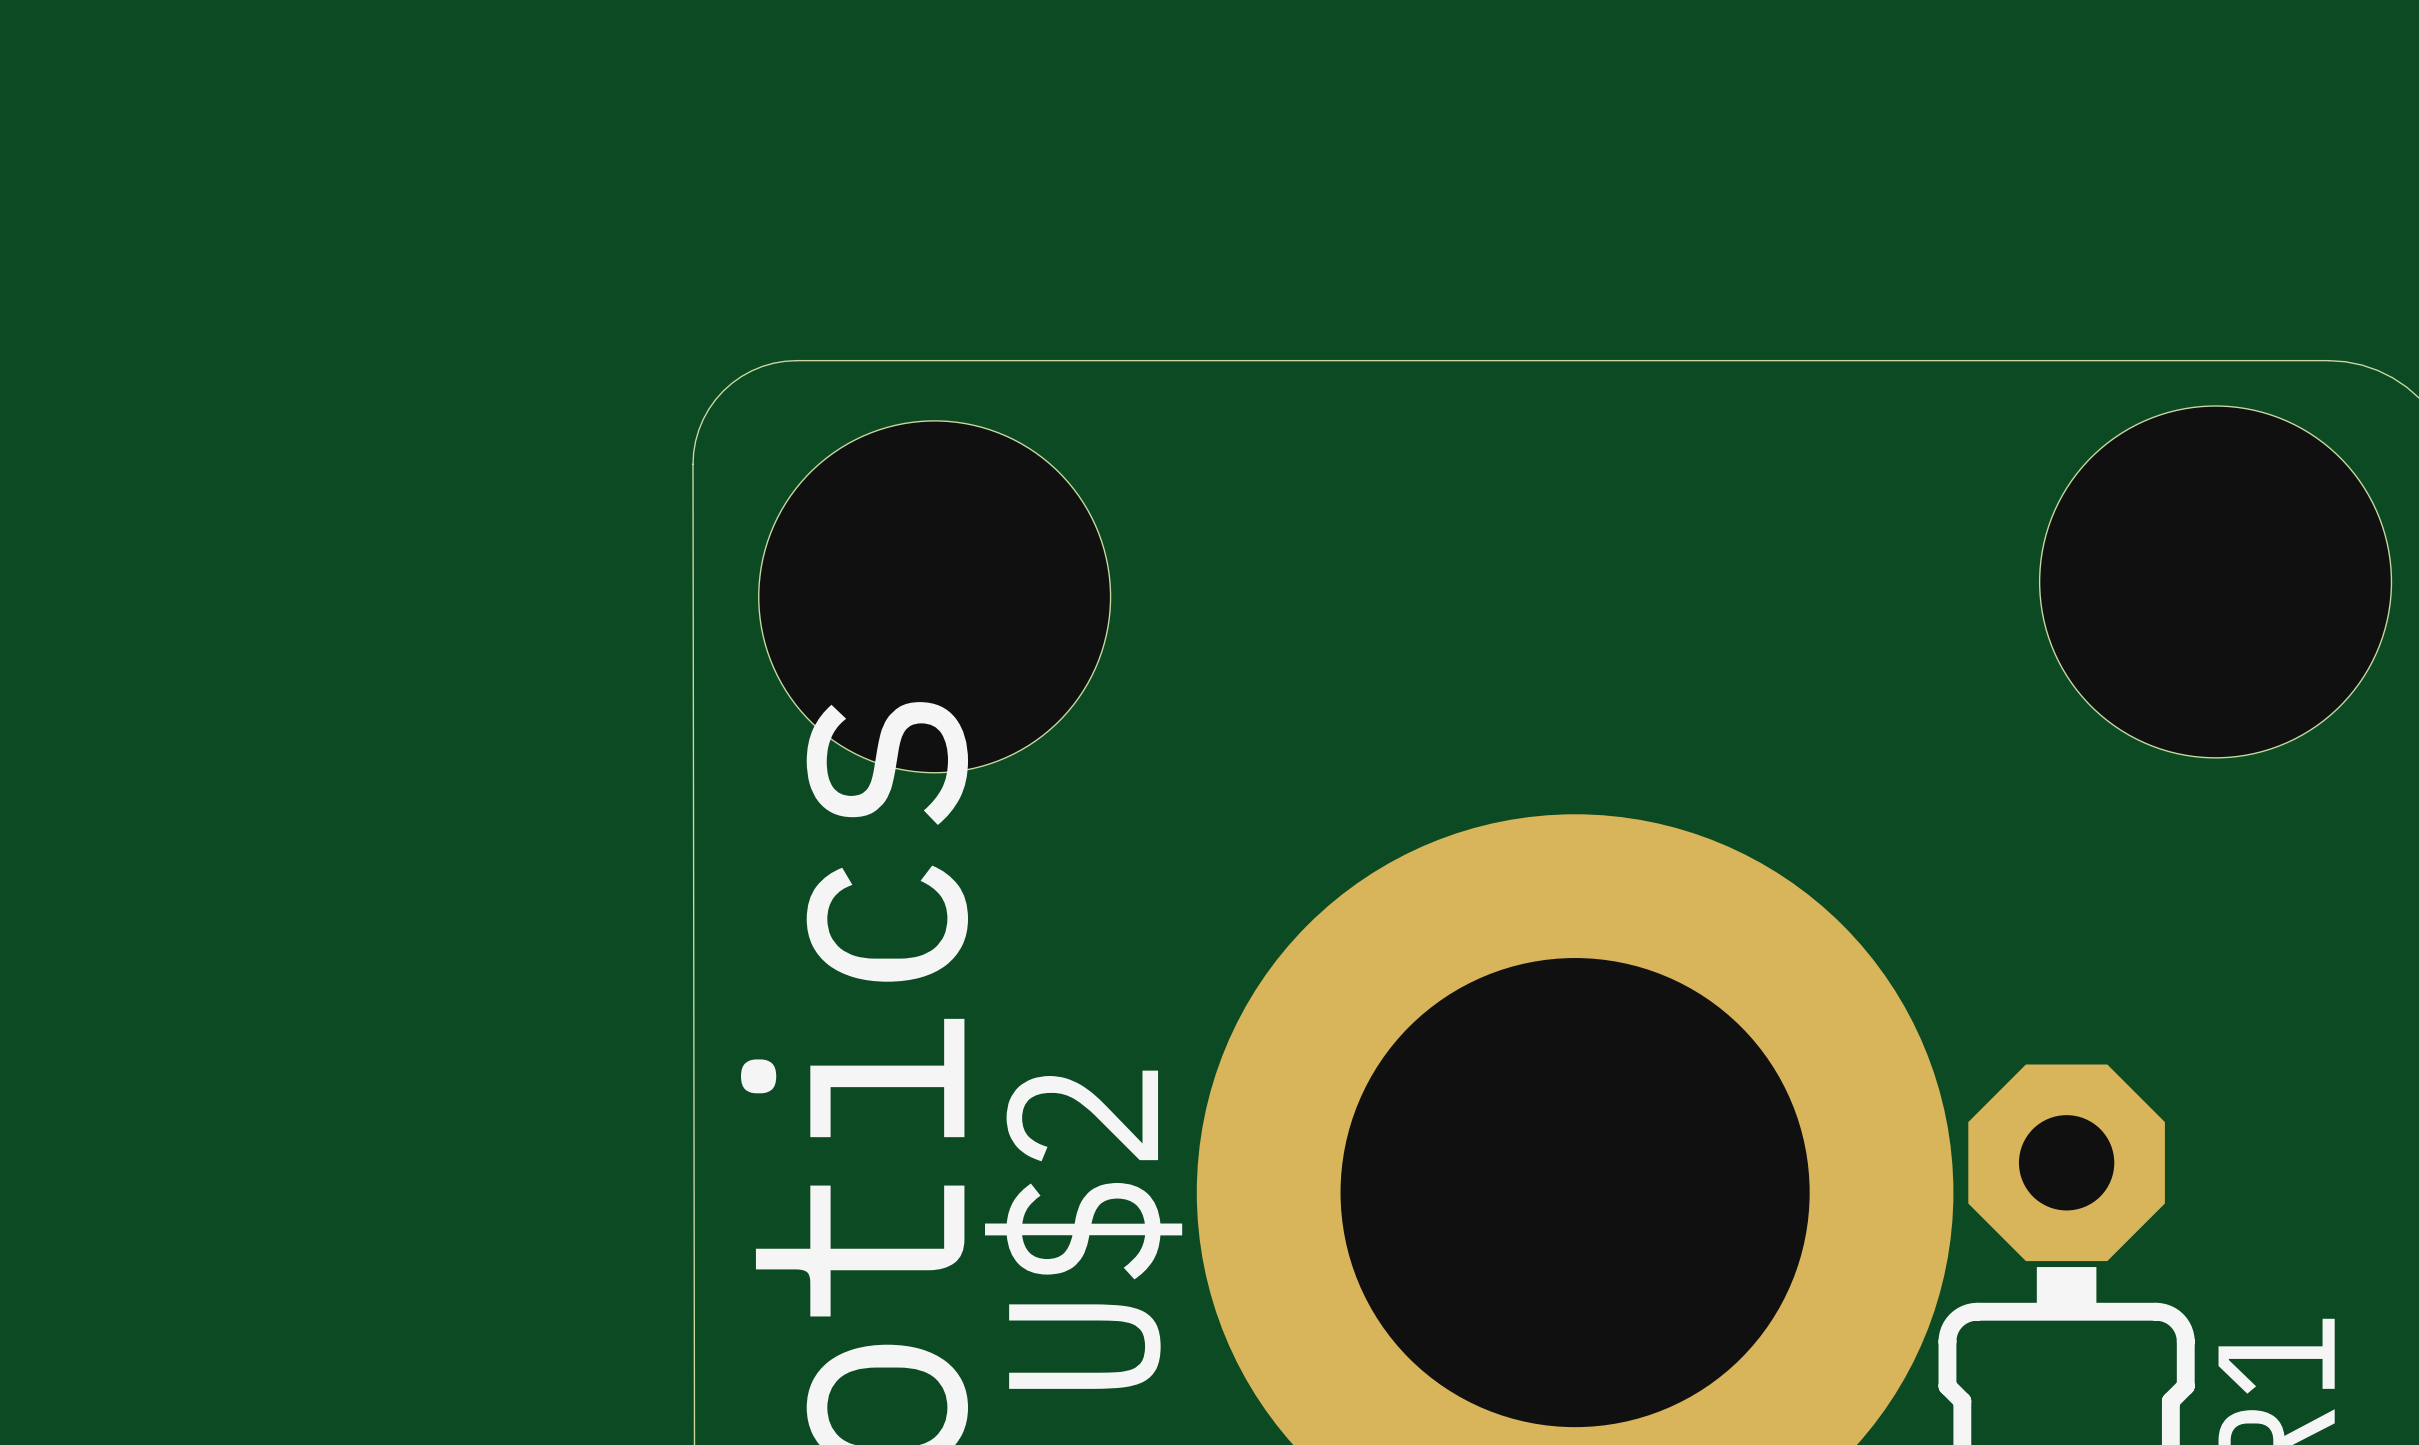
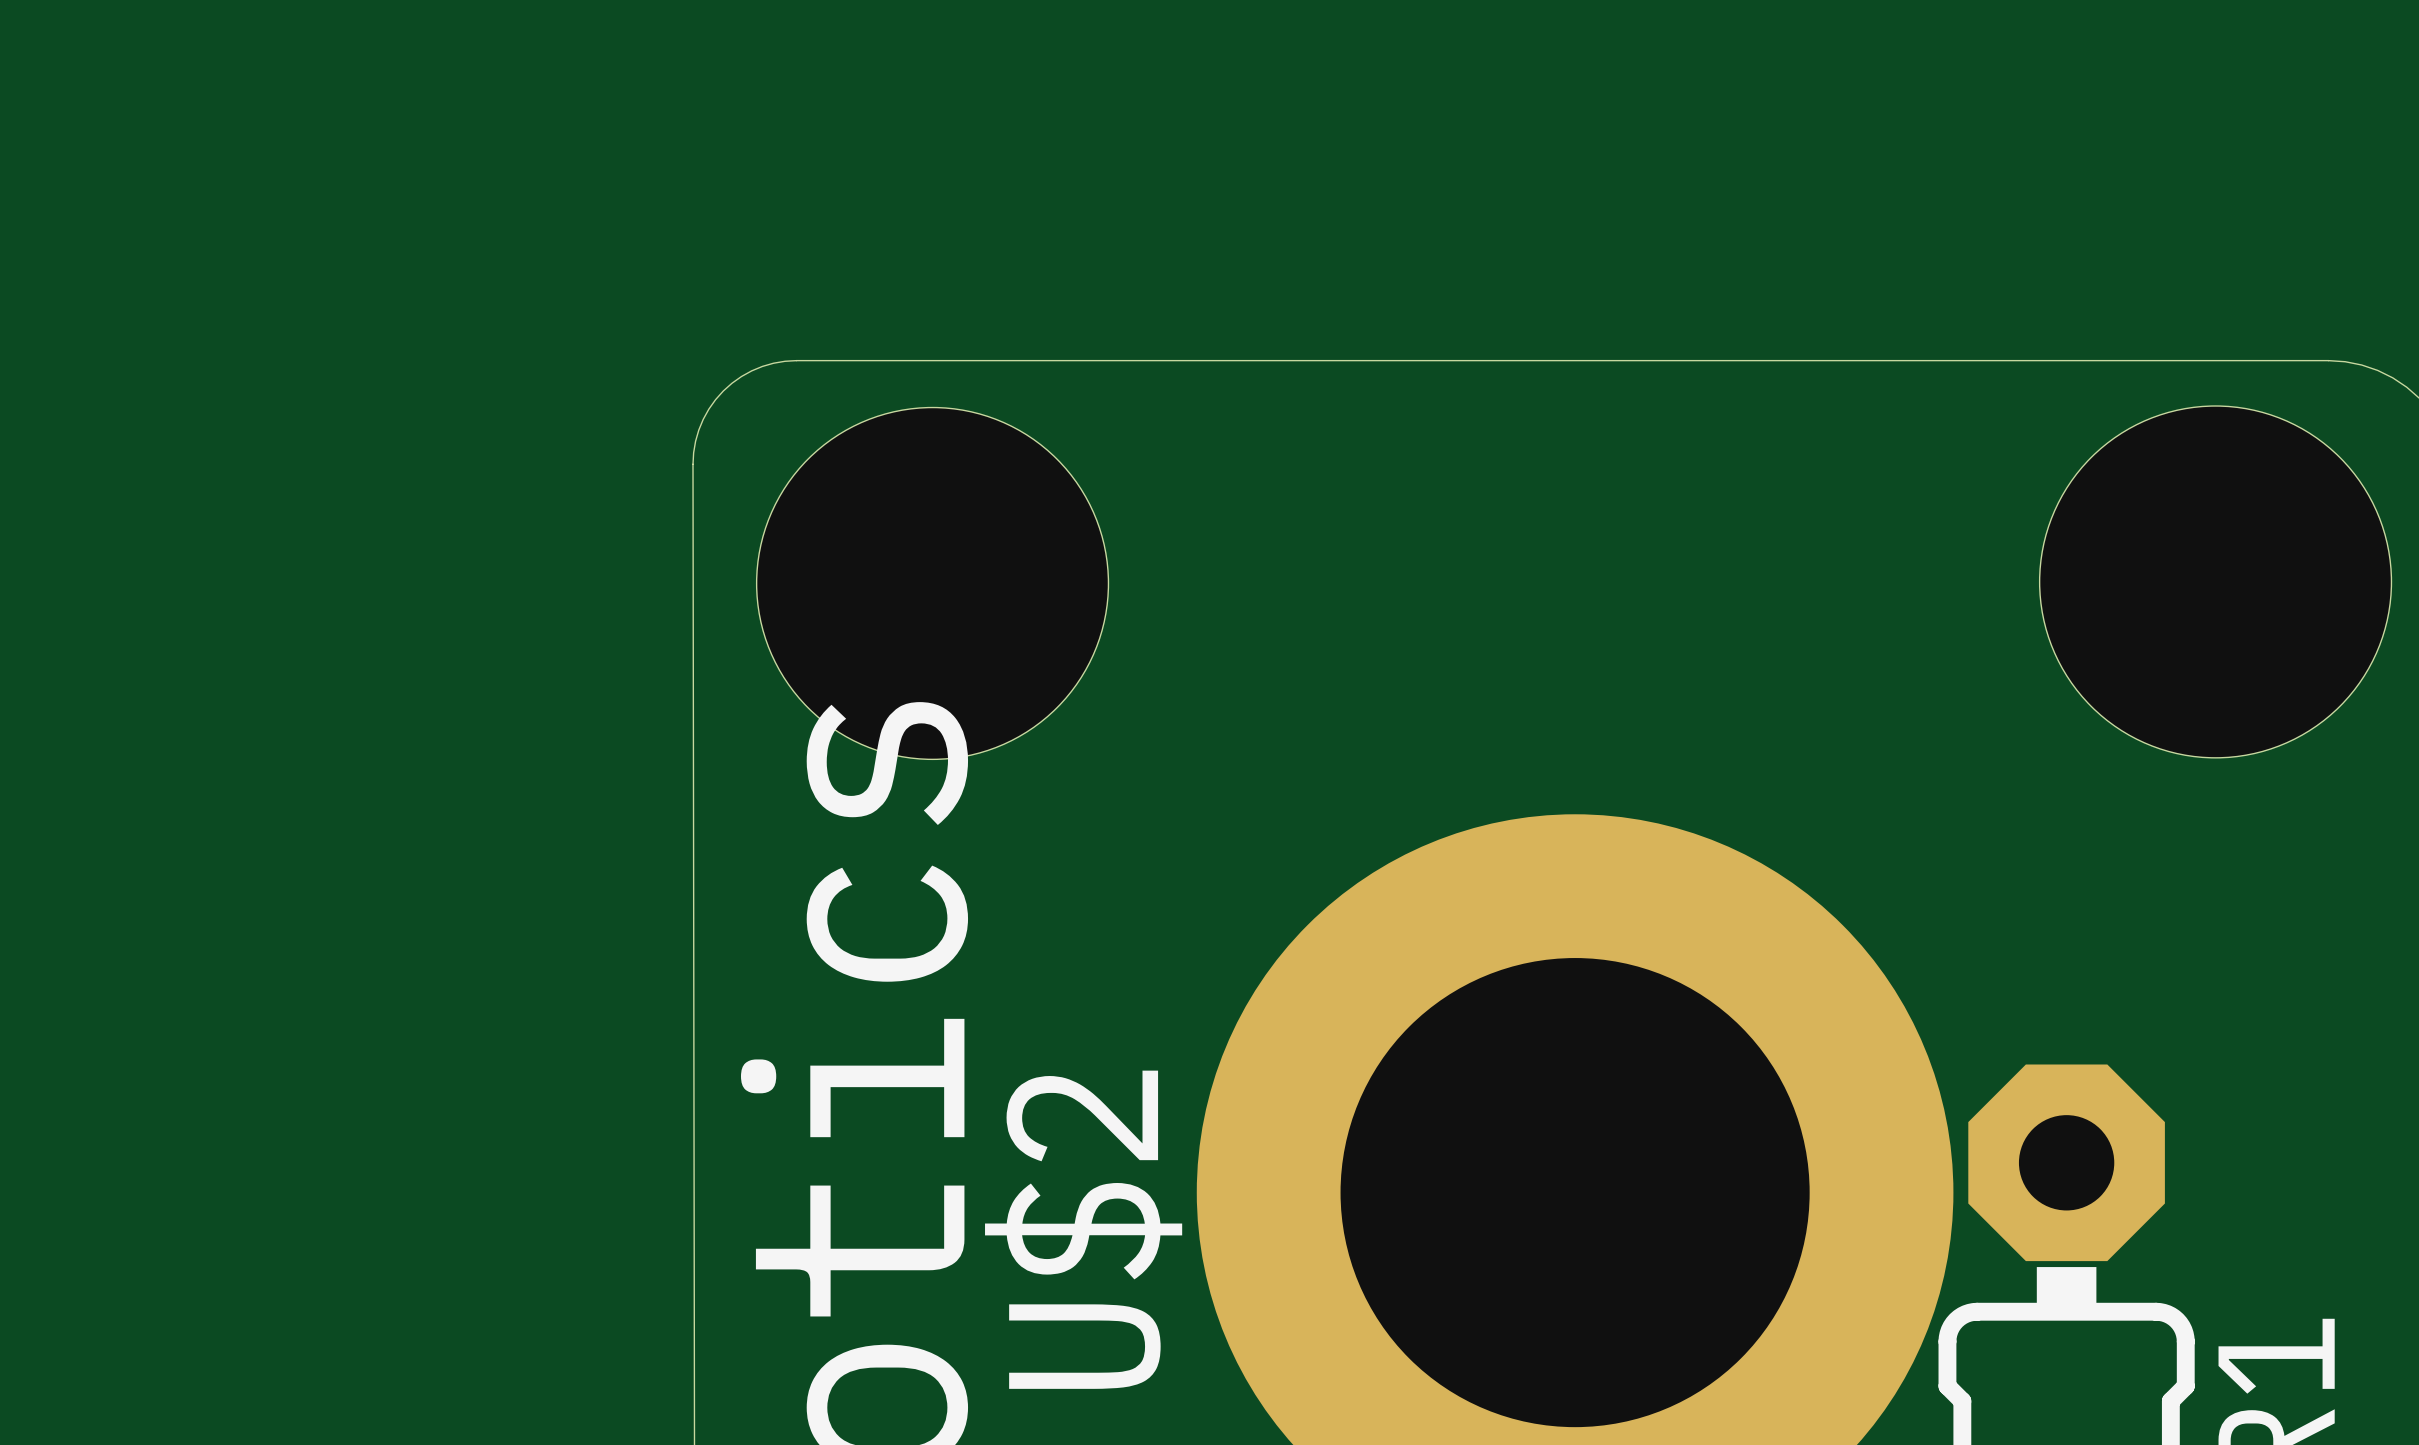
hole position: (934, 596) -> (932, 583)

